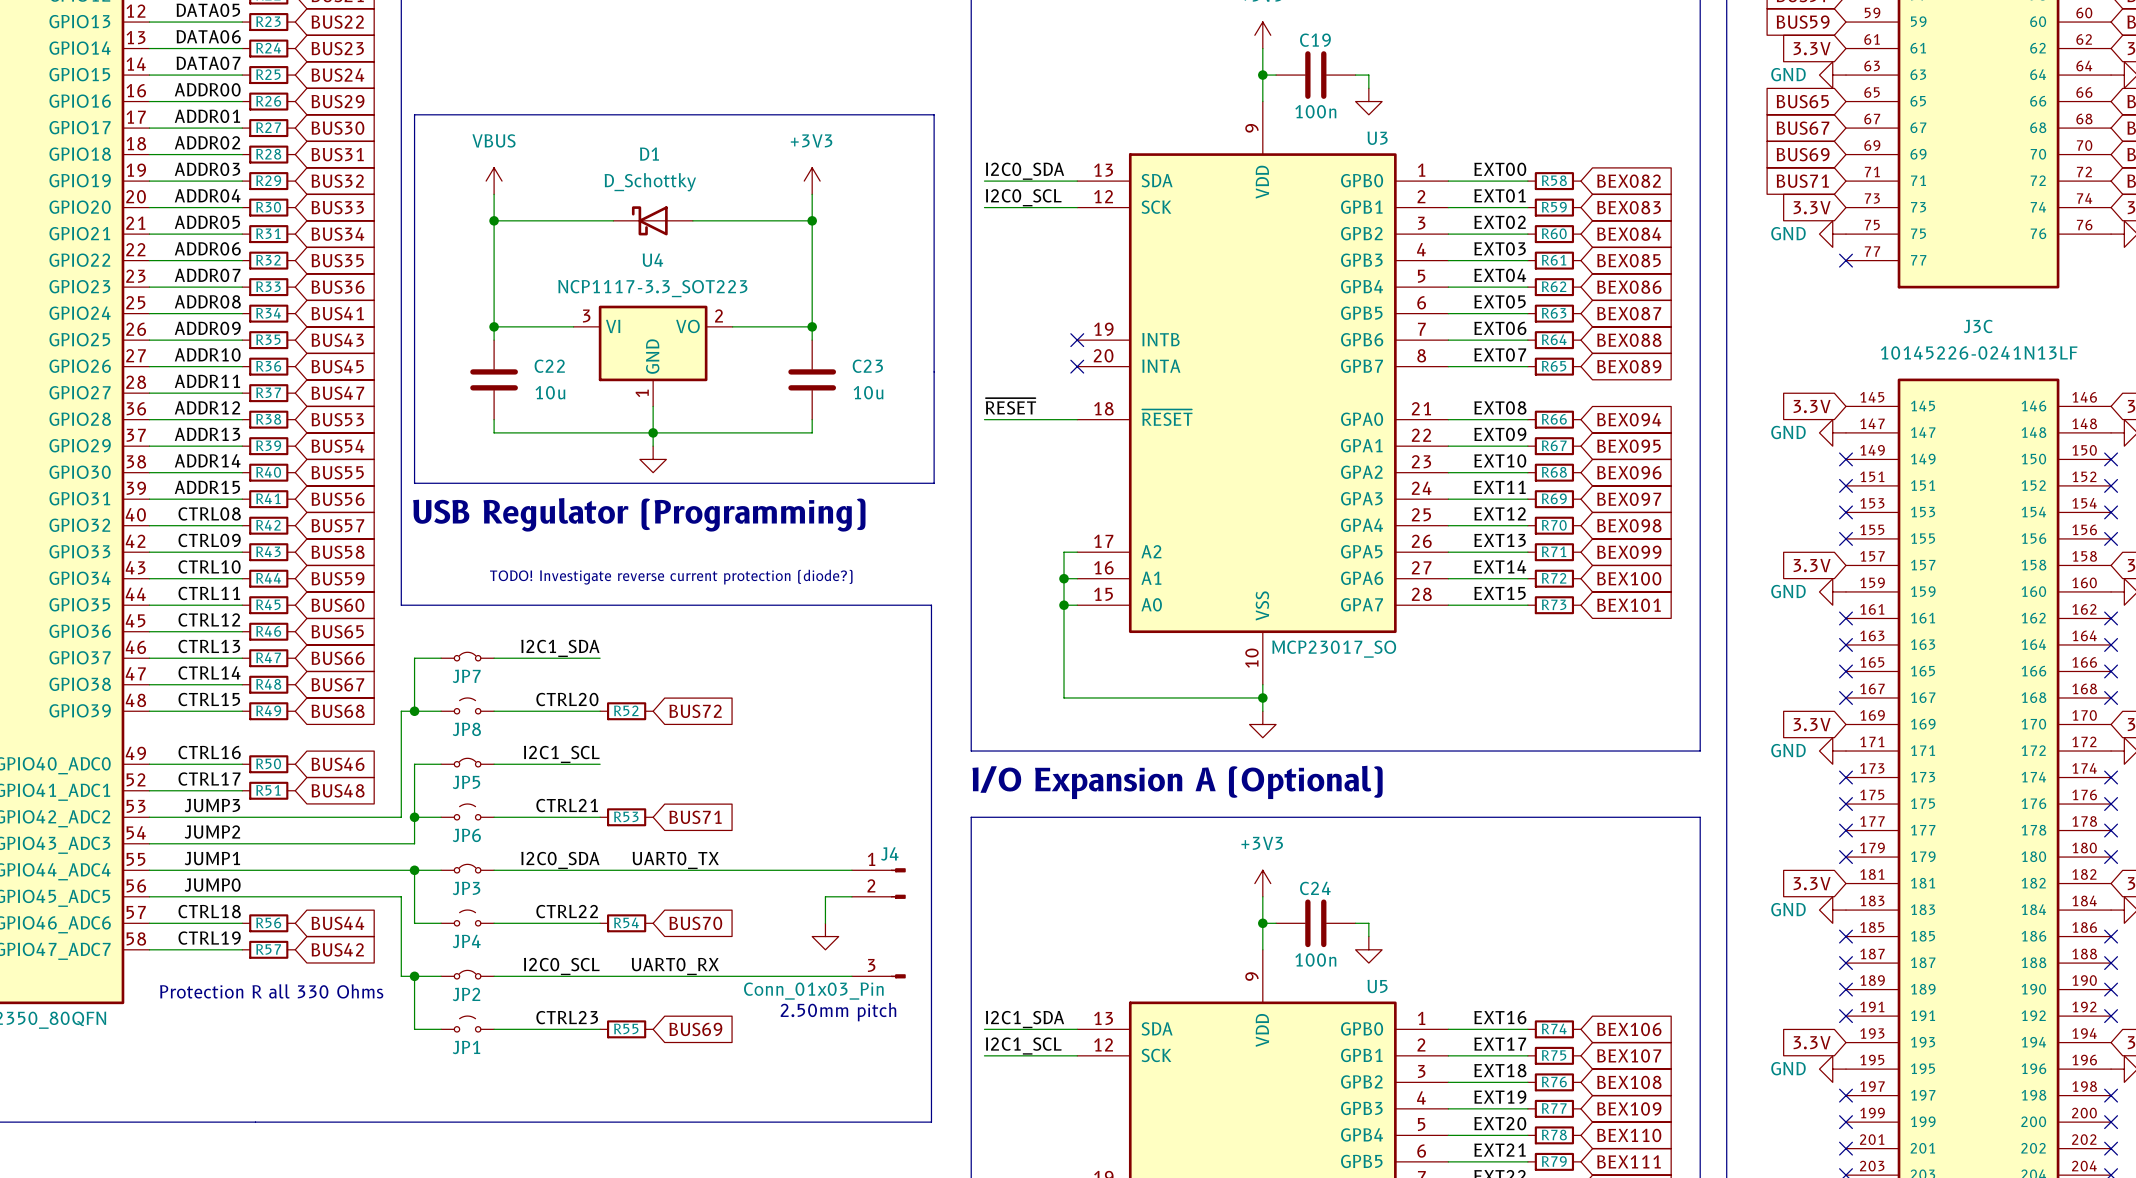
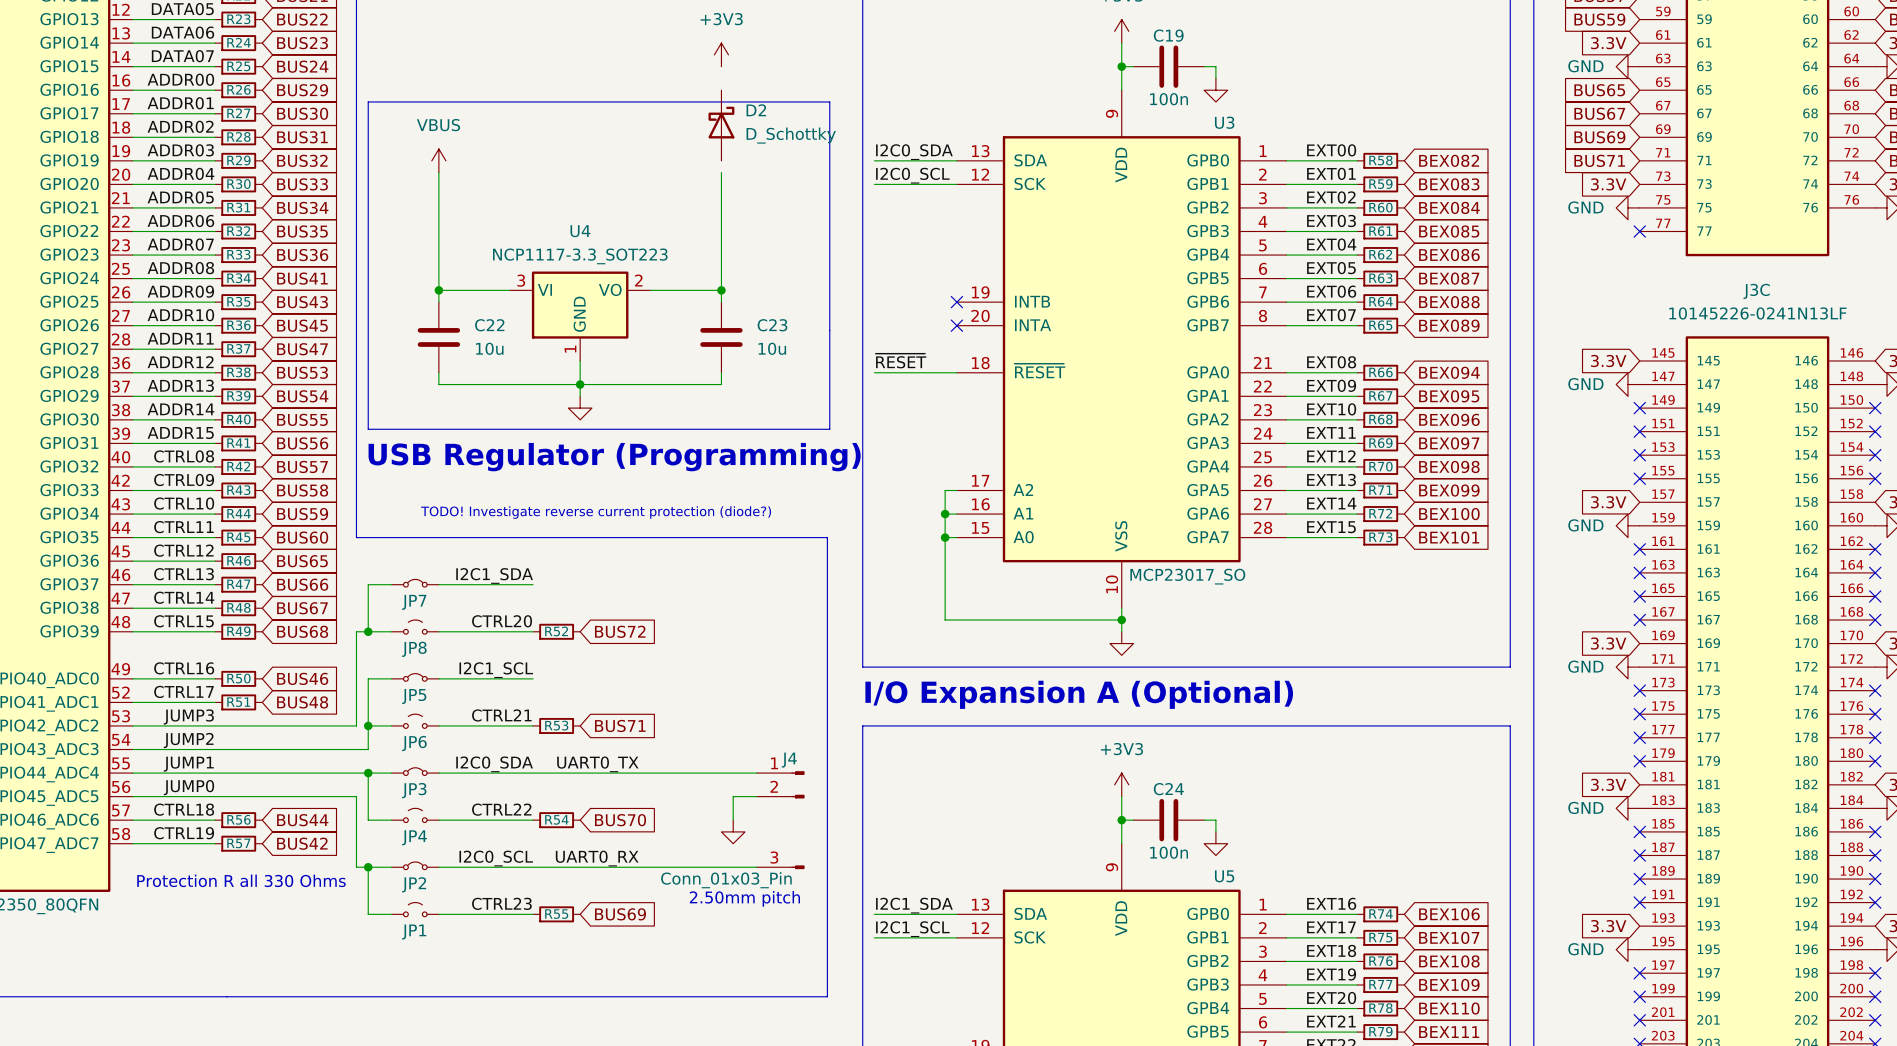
D2: none -> D_Schottky (721, 125)
power symbol position: +3V3 (812, 181) -> +3V3 (721, 54)
wire: (494, 220) (613, 220) -> none
junction: (494, 220) -> none
D1: D_Schottky (653, 220) -> none
wire: (692, 220) (812, 220) -> none
junction: (812, 220) -> none

